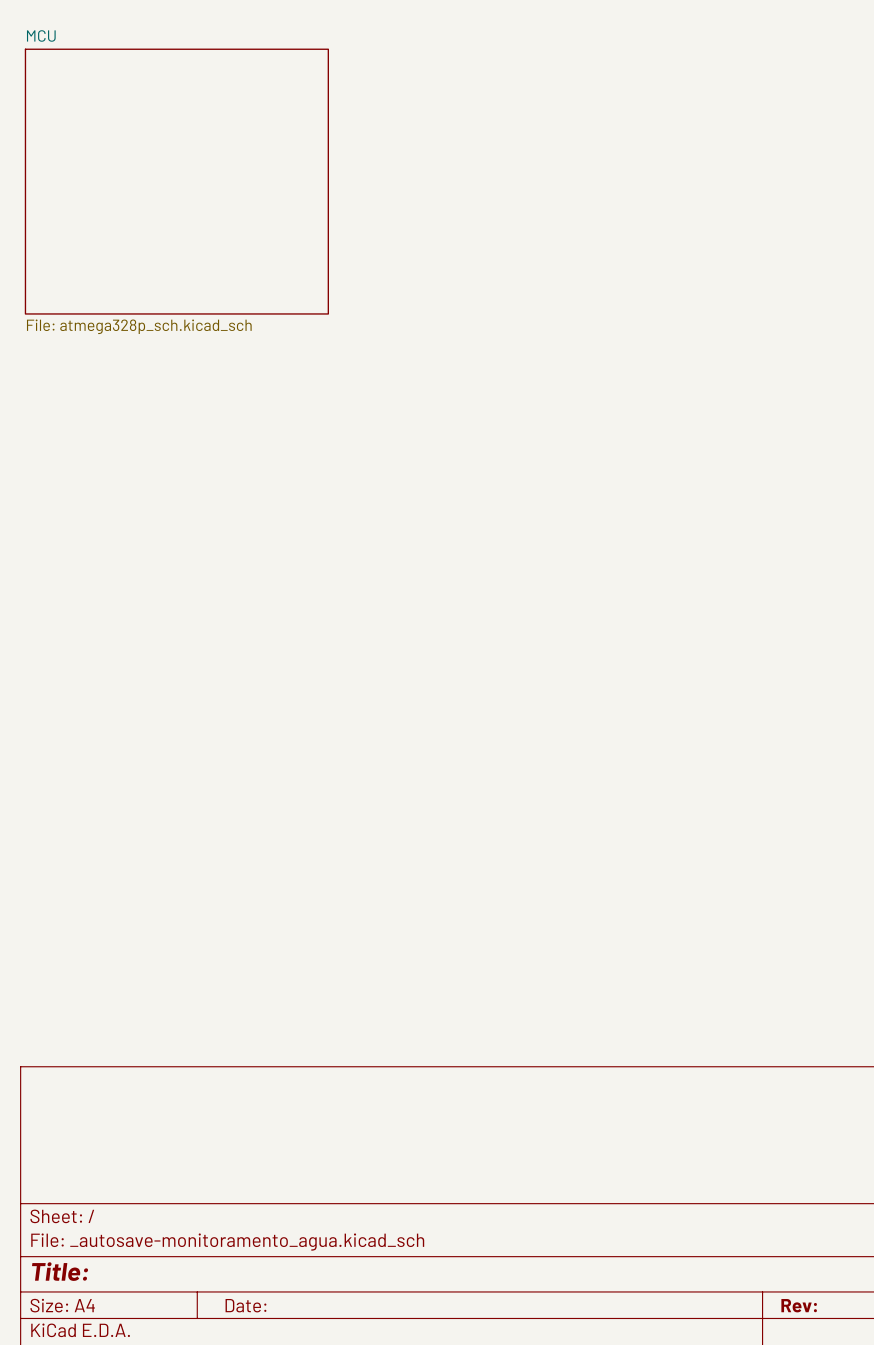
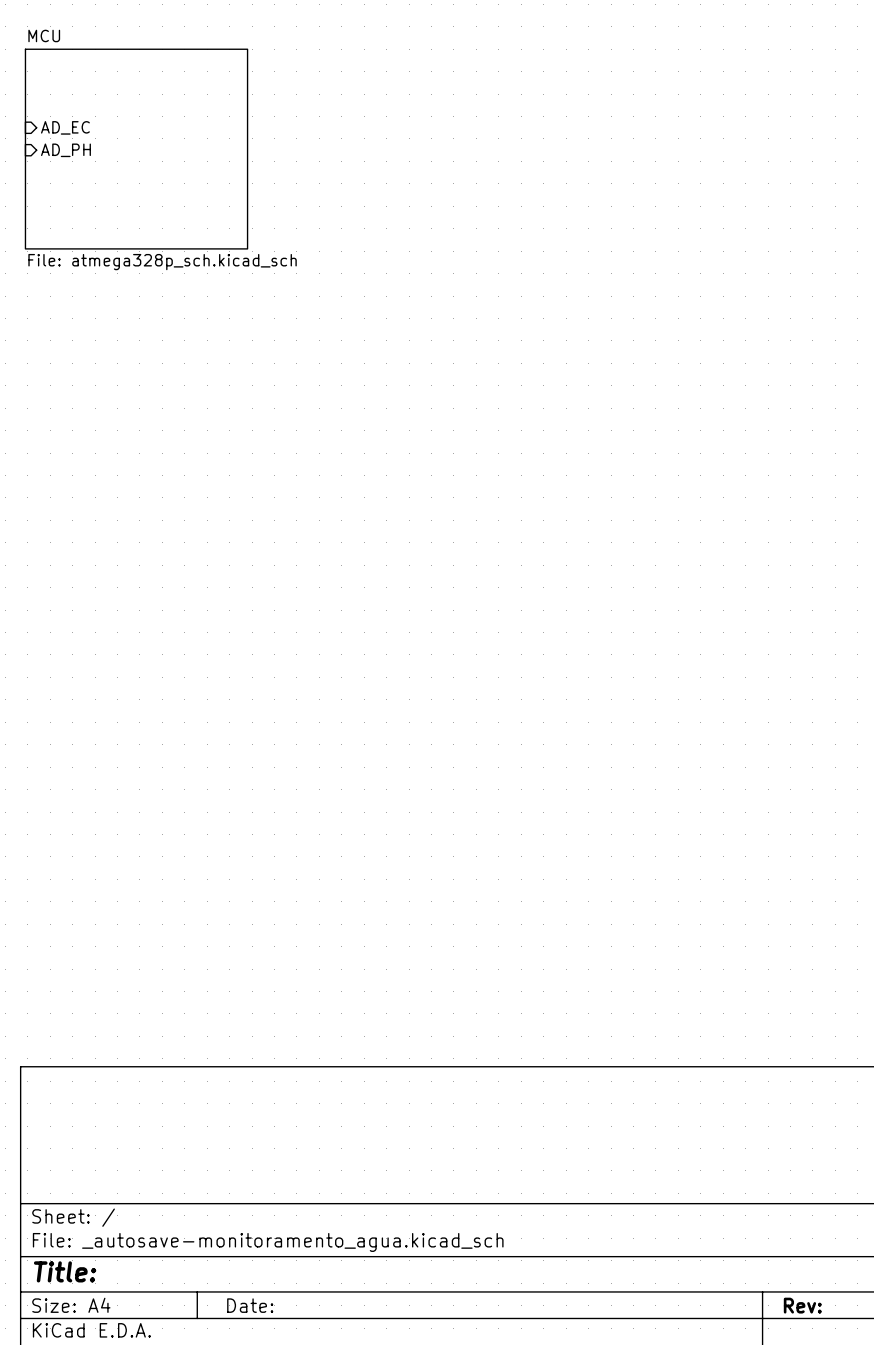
sheet pin: none -> AD_EC (65, 127)
sheet pin: none -> AD_PH (65, 150)
sheet MCU: none -> File: atmega328p_sch.kicad_sch (136, 149)
sheet MCU: File: atmega328p_sch.kicad_sch (176, 181) -> none

